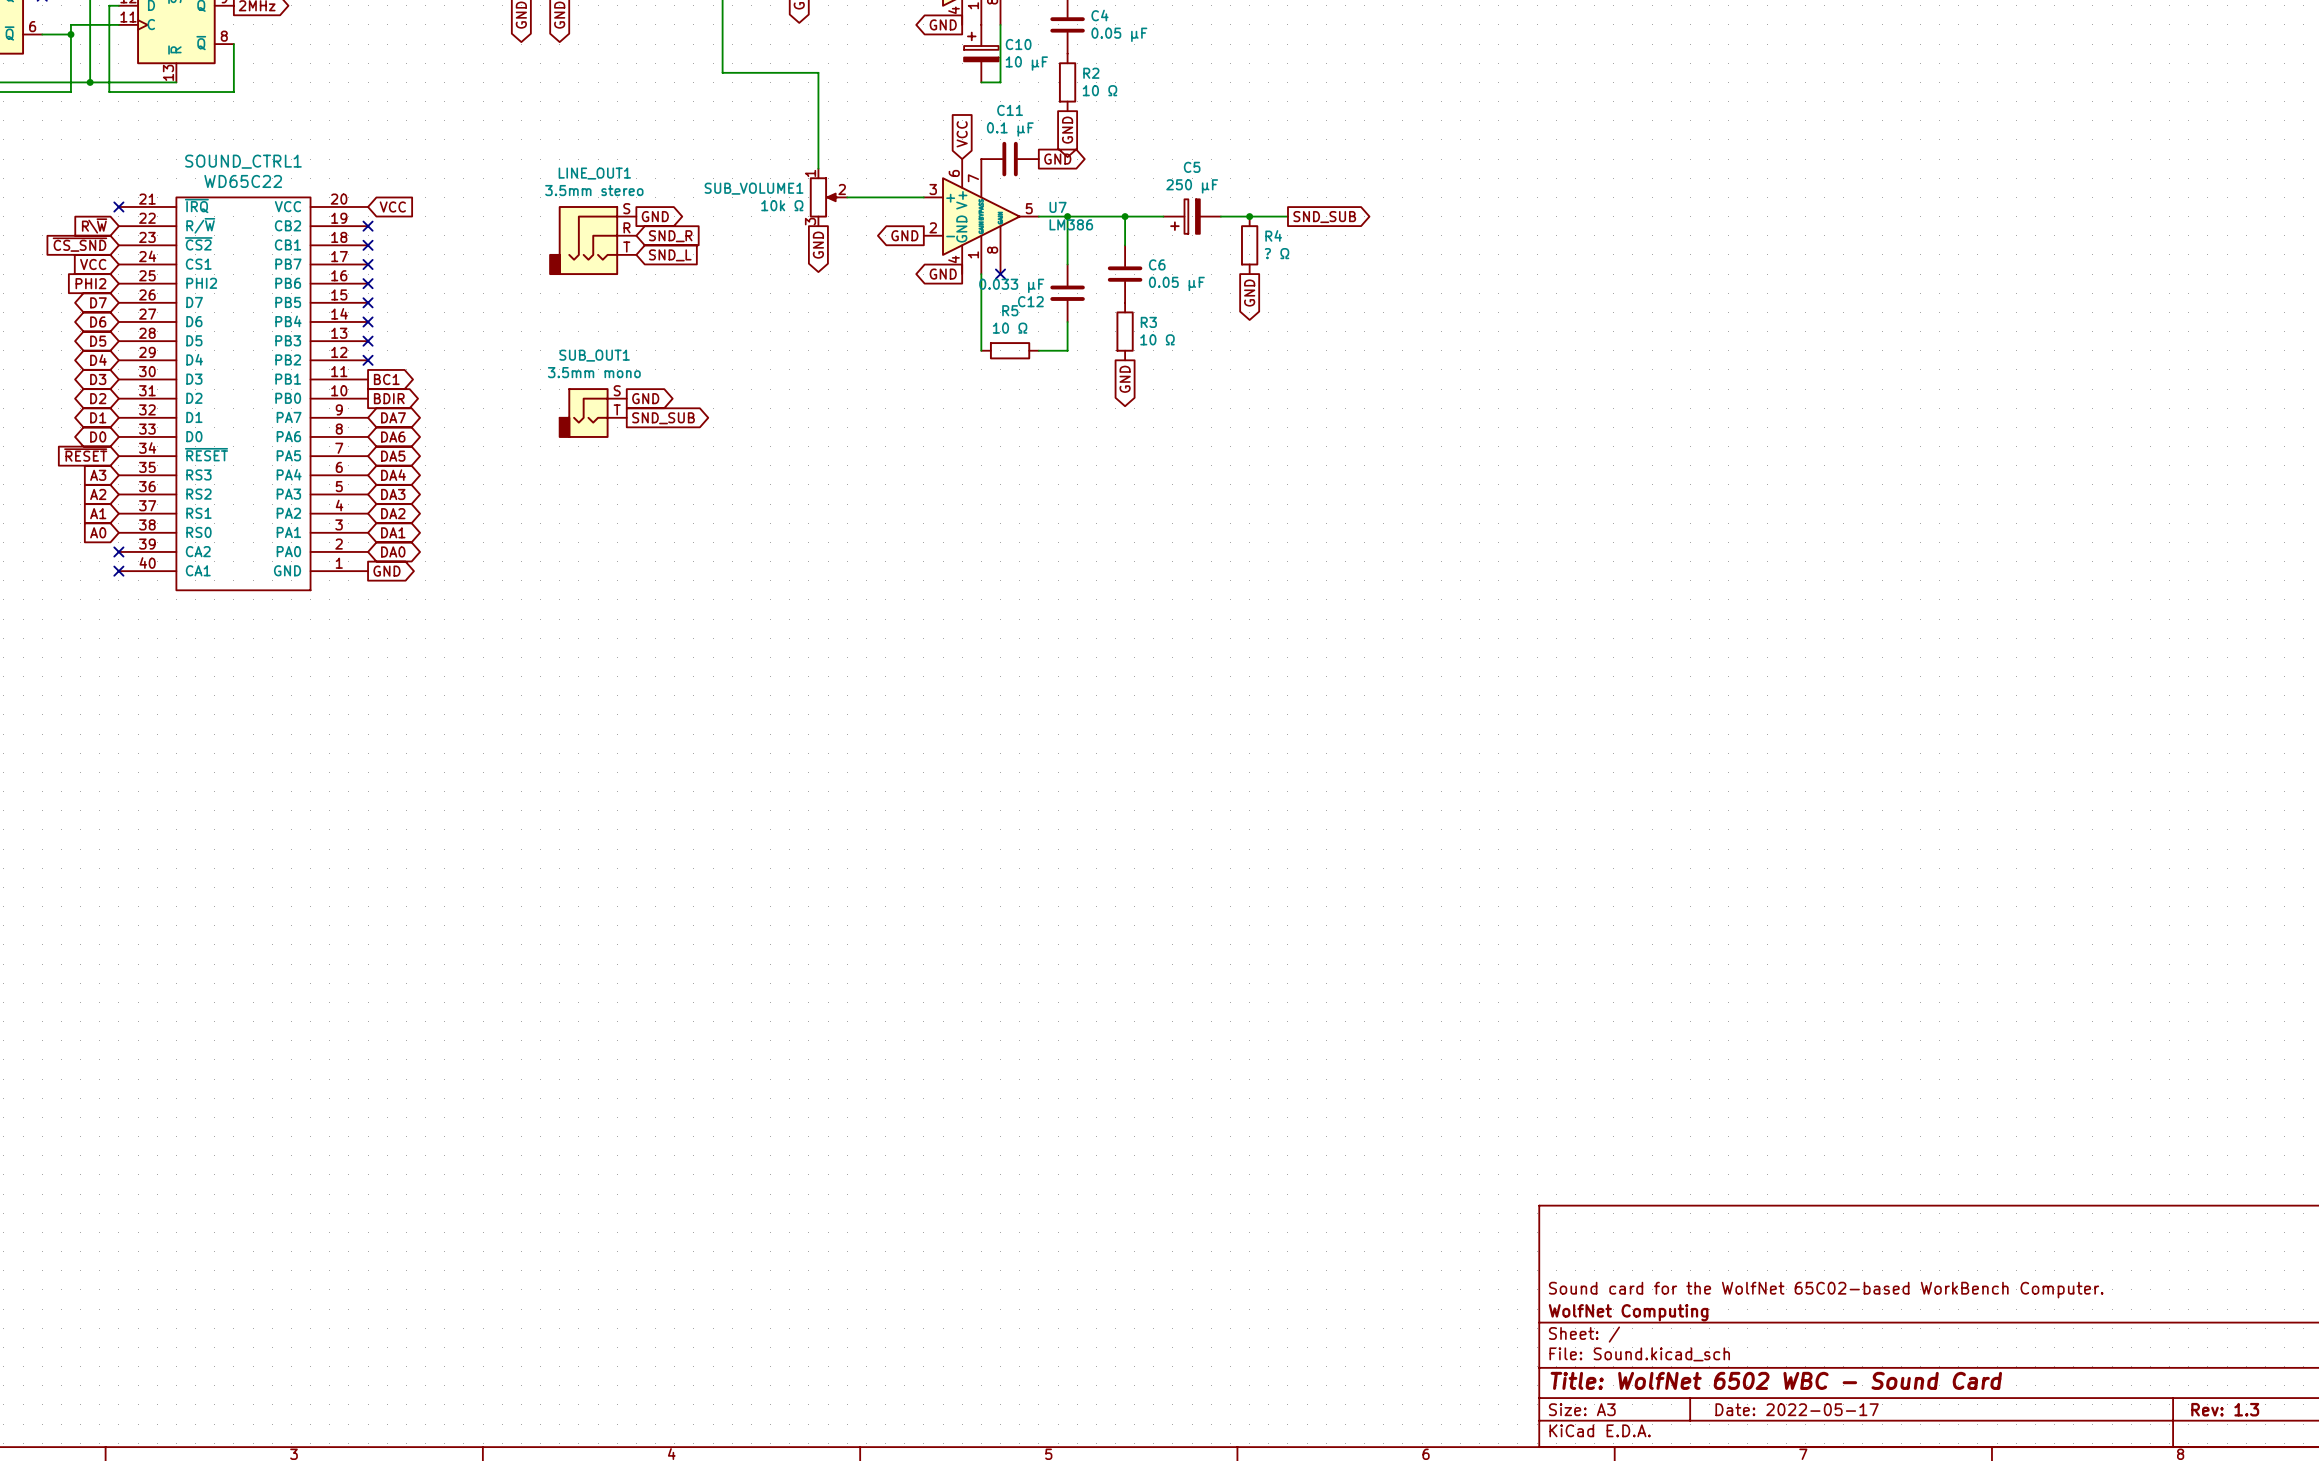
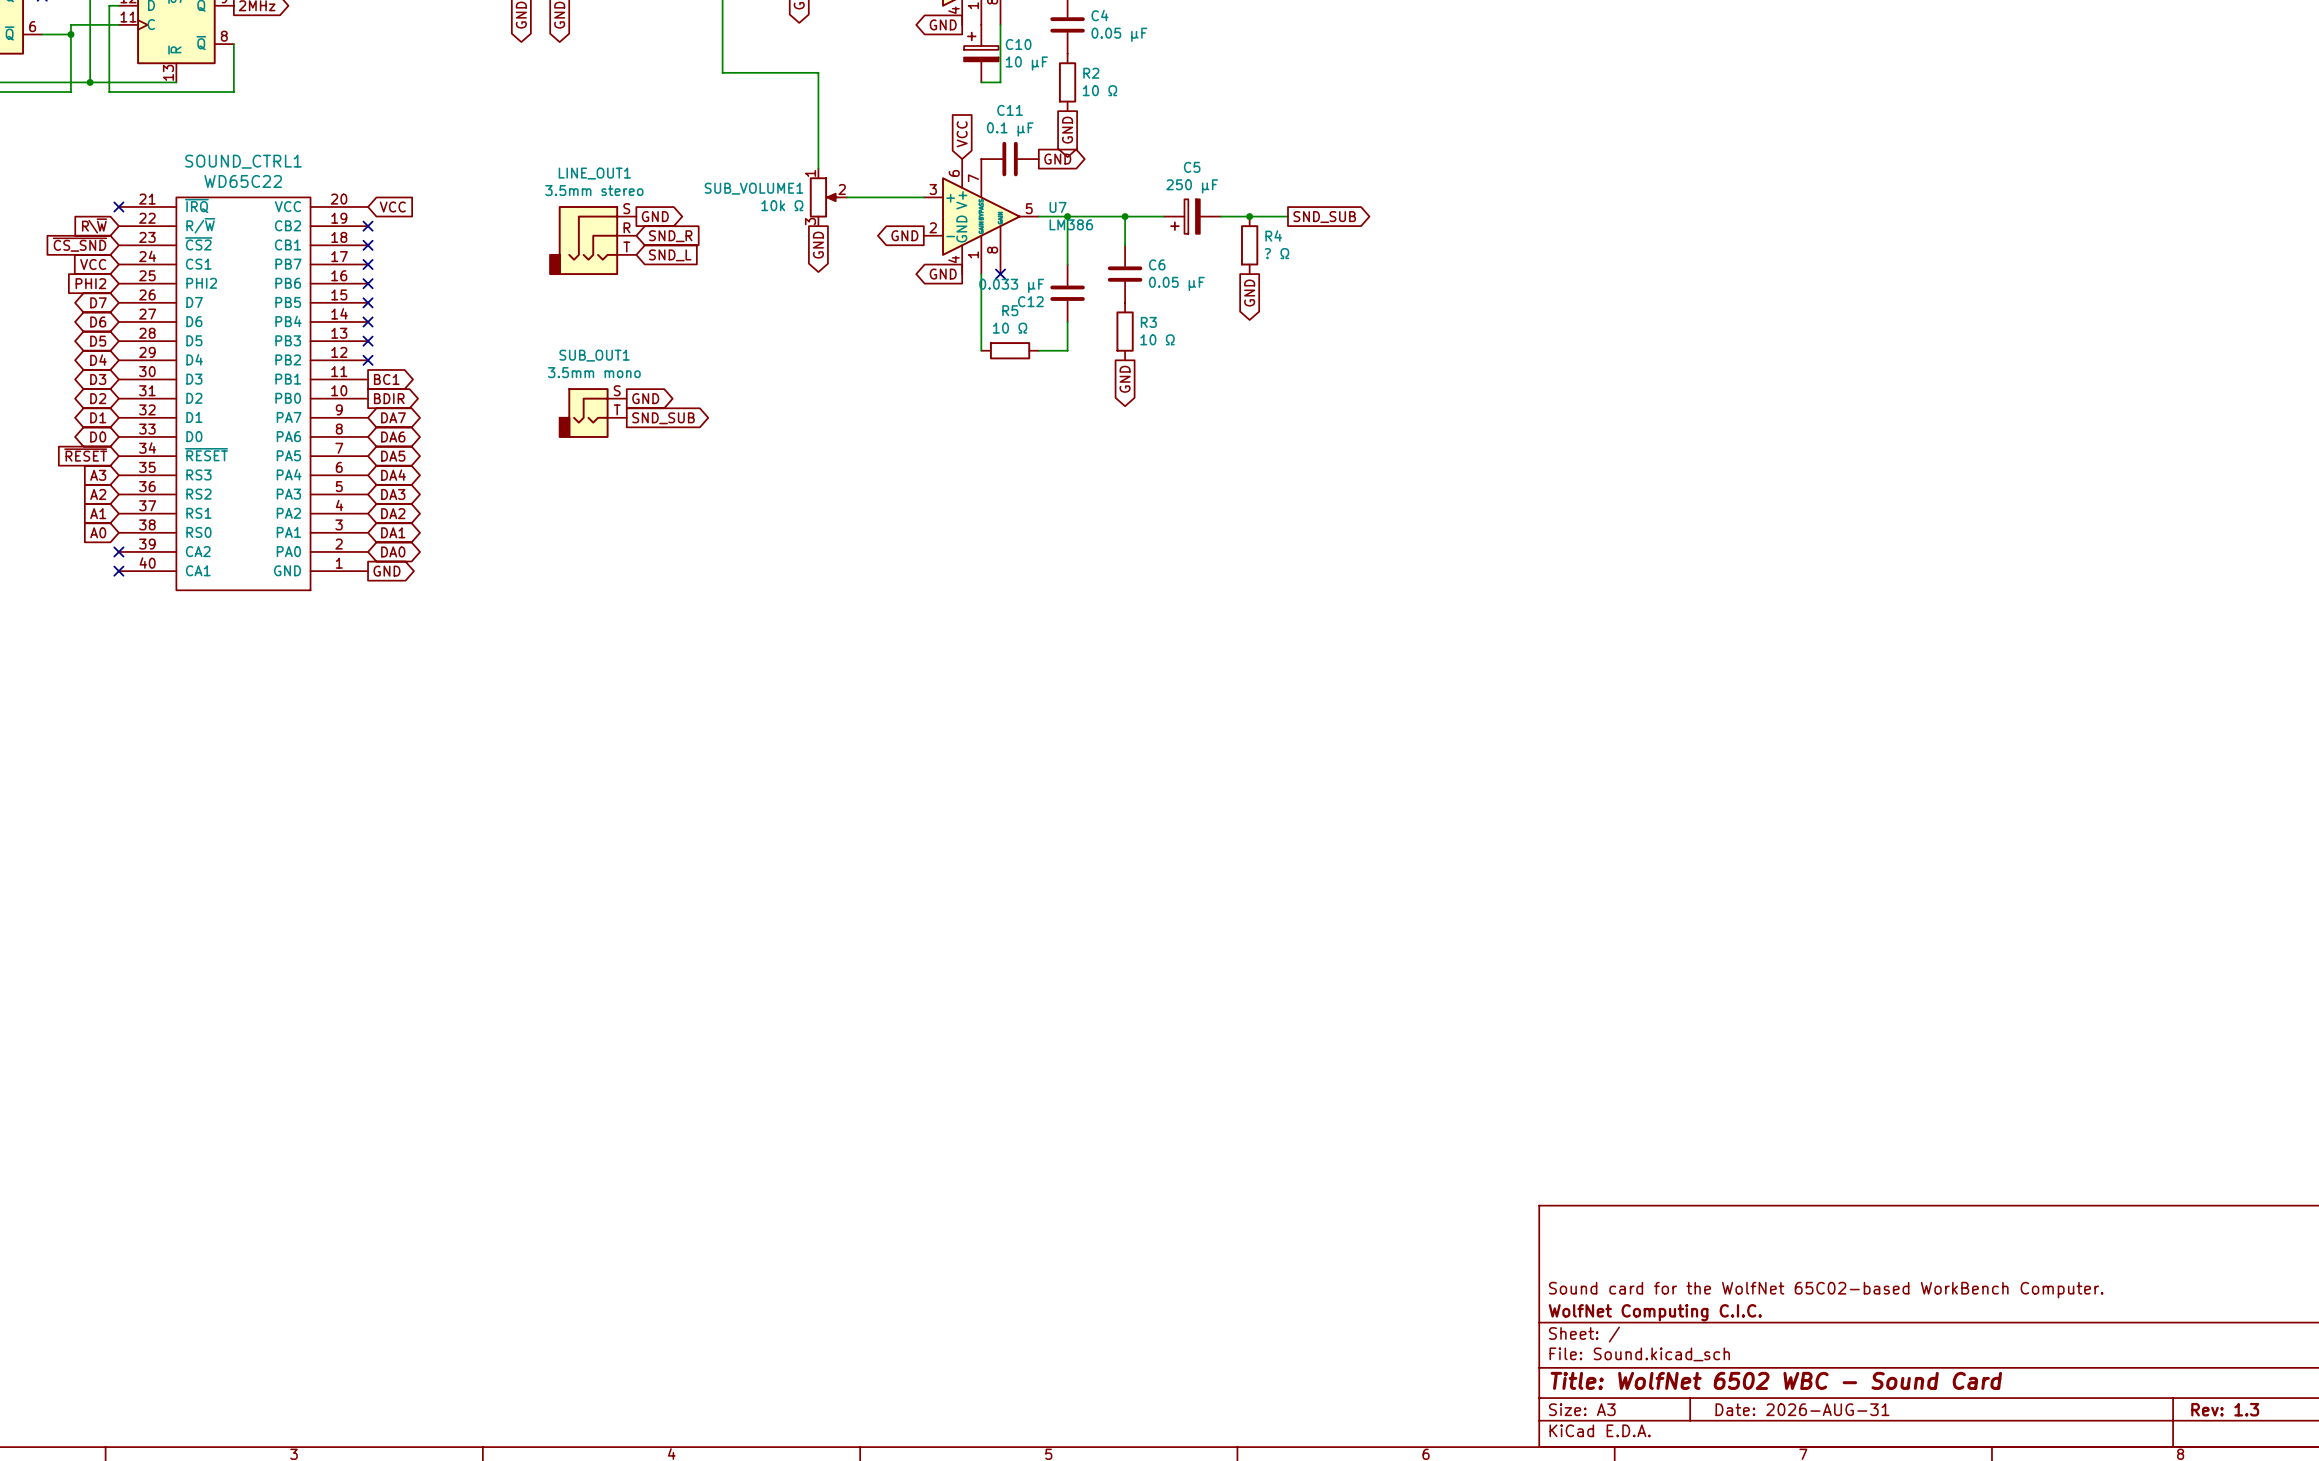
title block: WolfNet Computing (1628, 1312) -> WolfNet Computing C.I.C. (1655, 1312)
title block: Date: 2022-05-17 (1797, 1409) -> Date: 2026-AUG-31 (1802, 1409)

